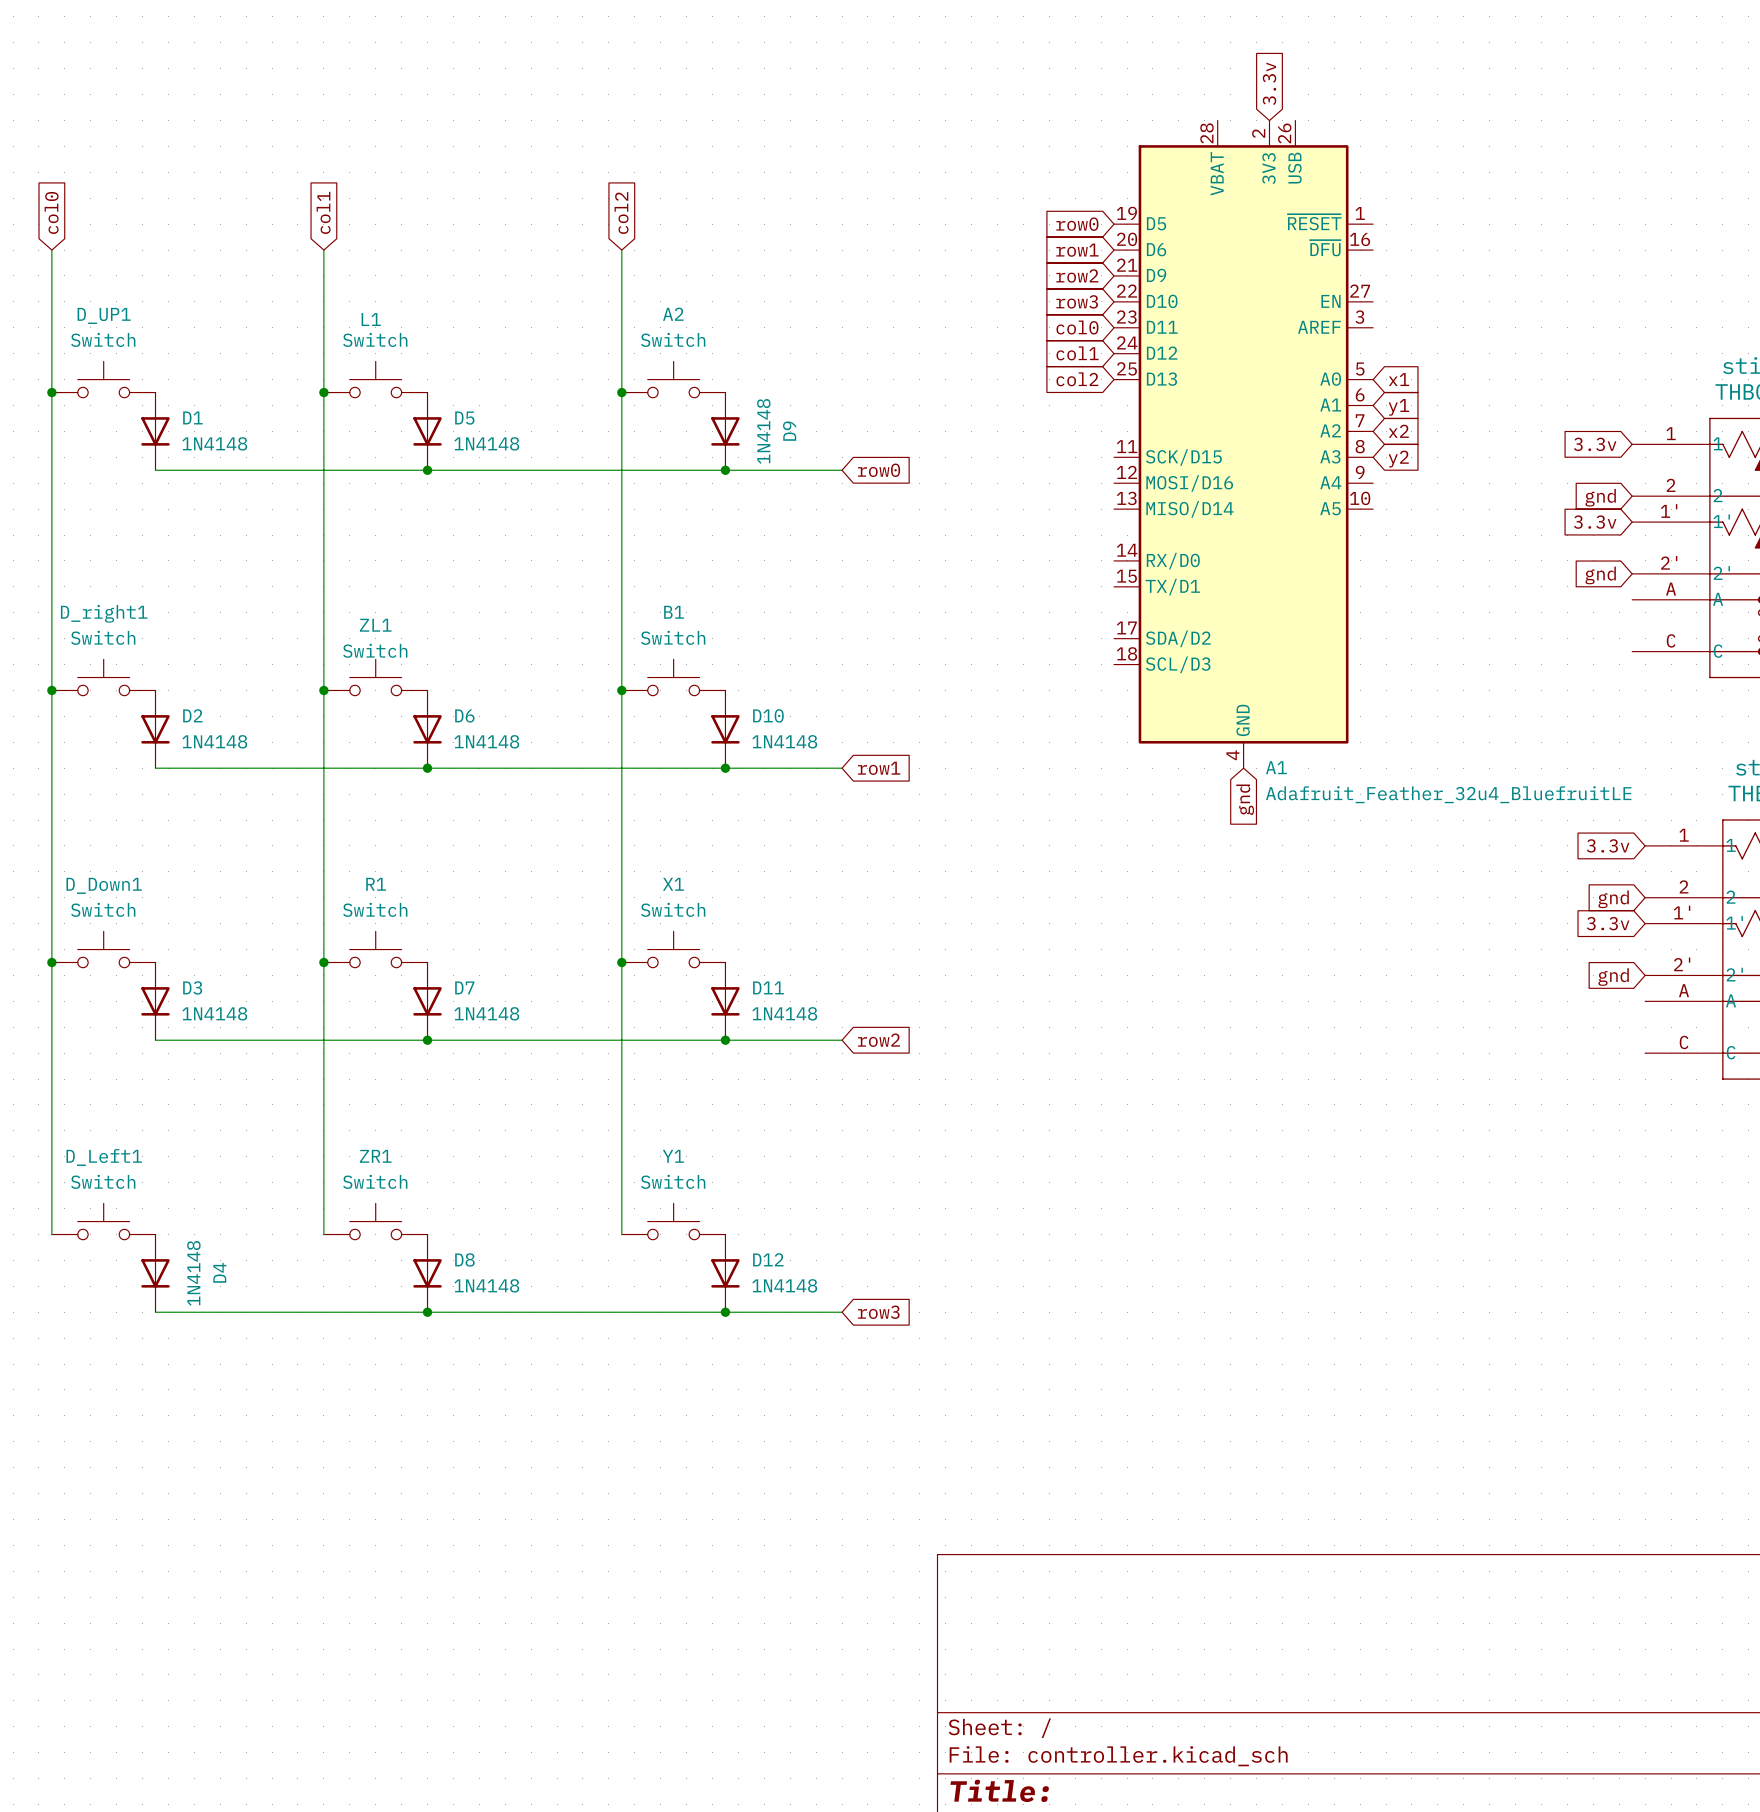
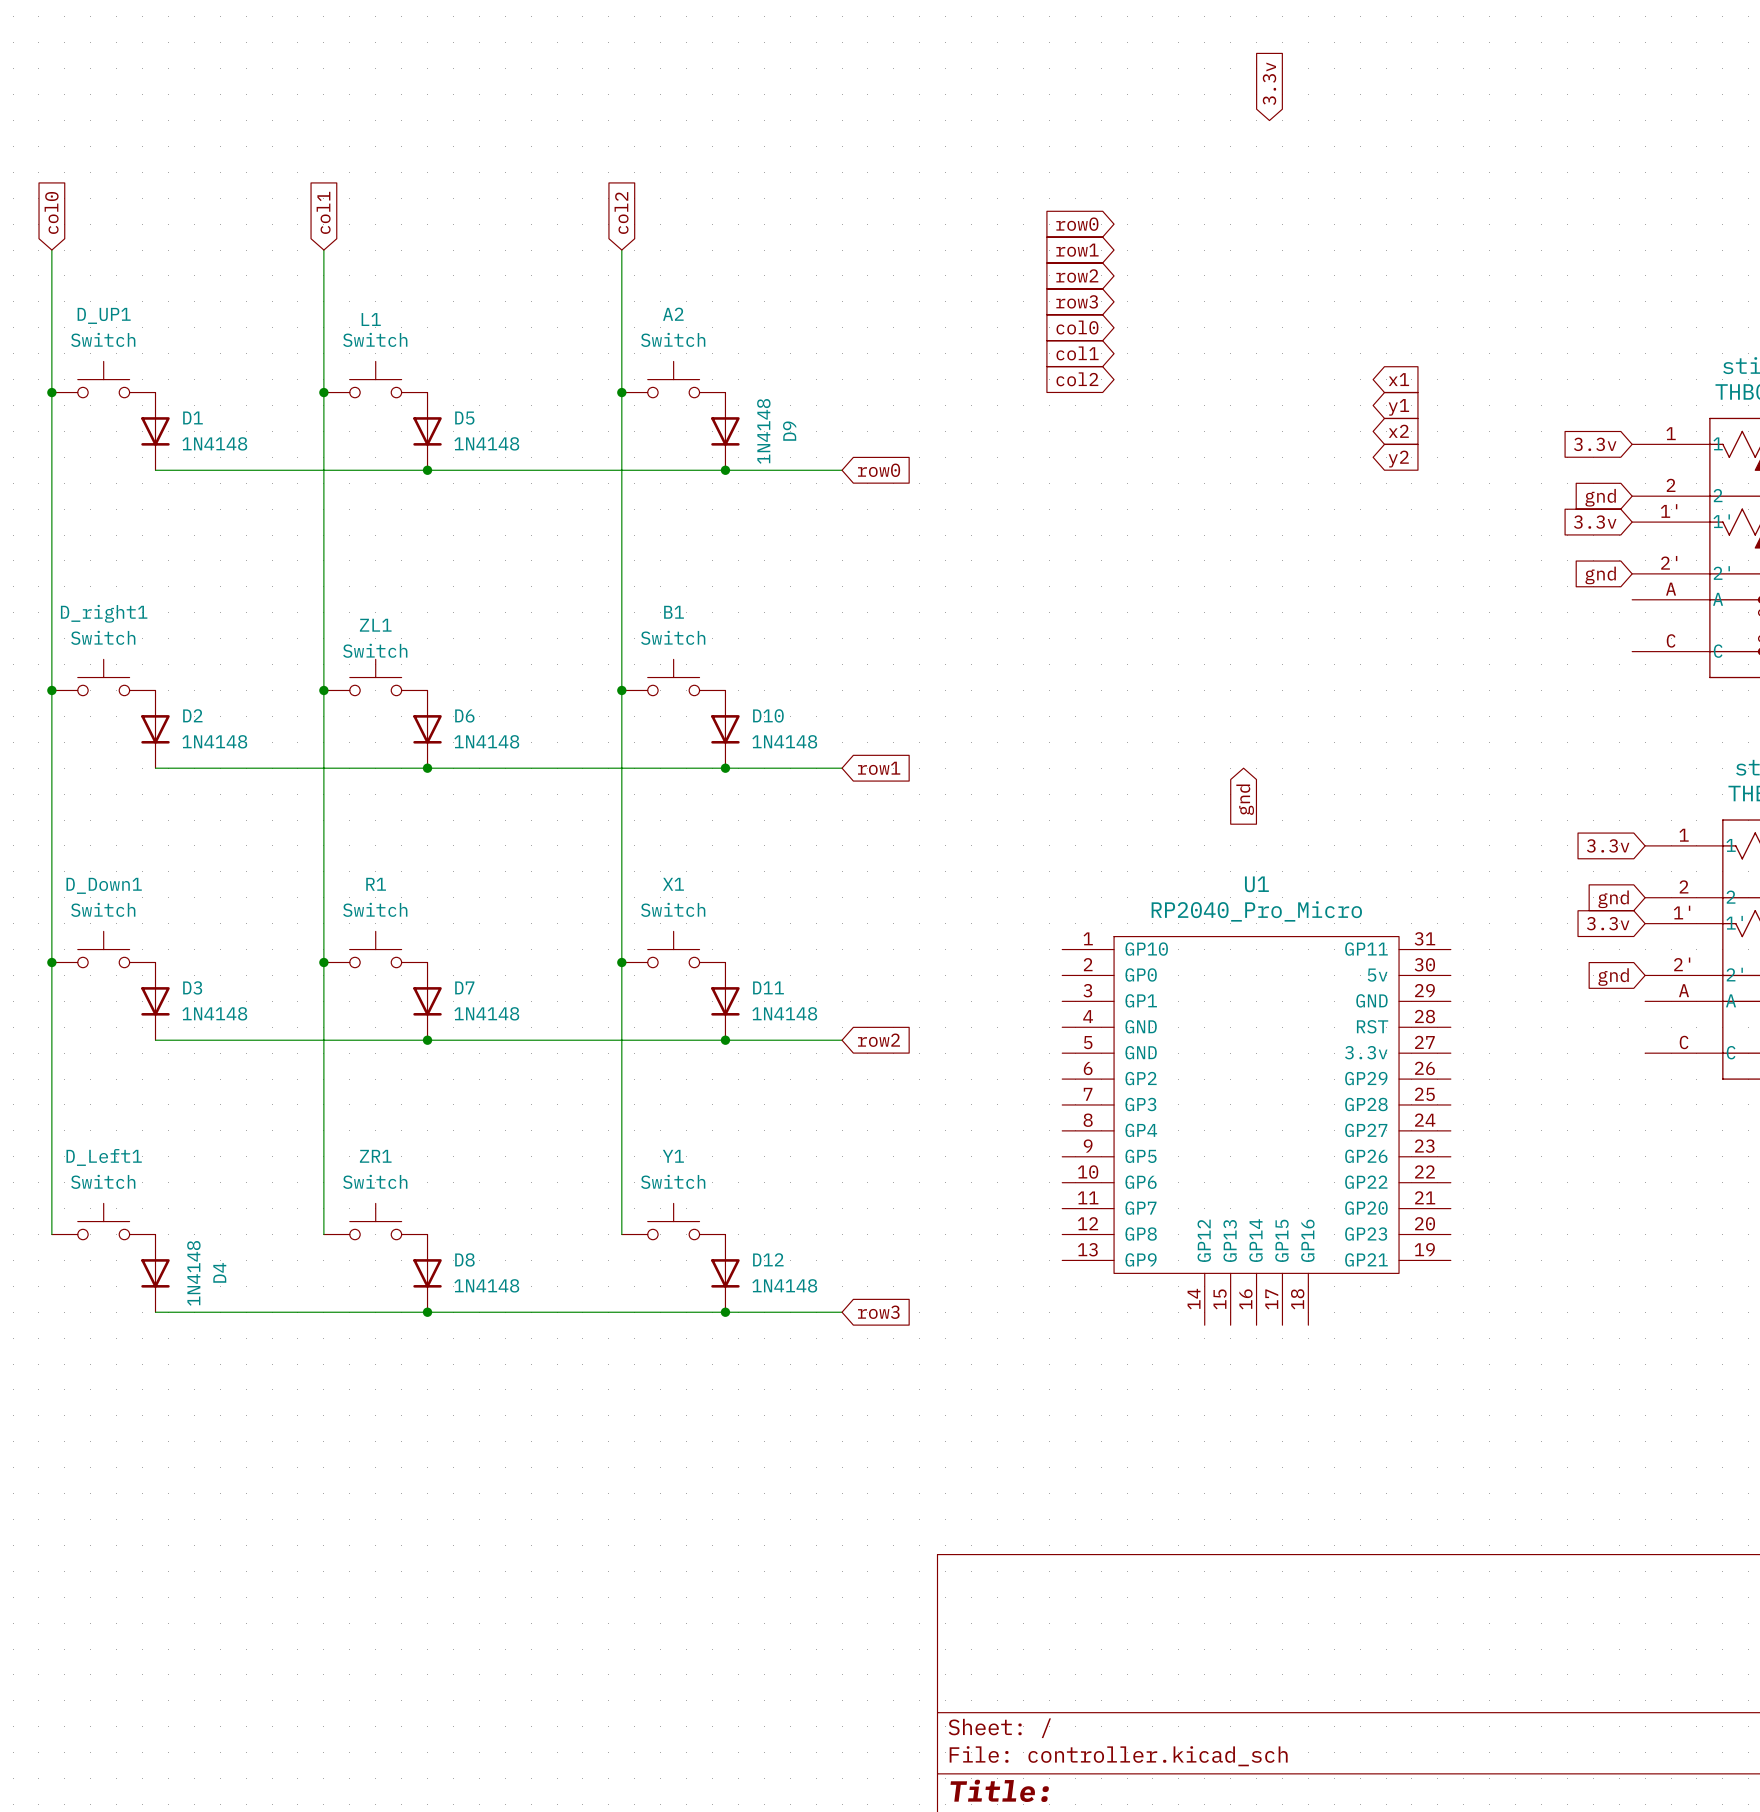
A1: Adafruit_Feather_32u4_BluefruitLE (1243, 444) -> none
U1: none -> RP2040_Pro_Micro (1256, 1130)

